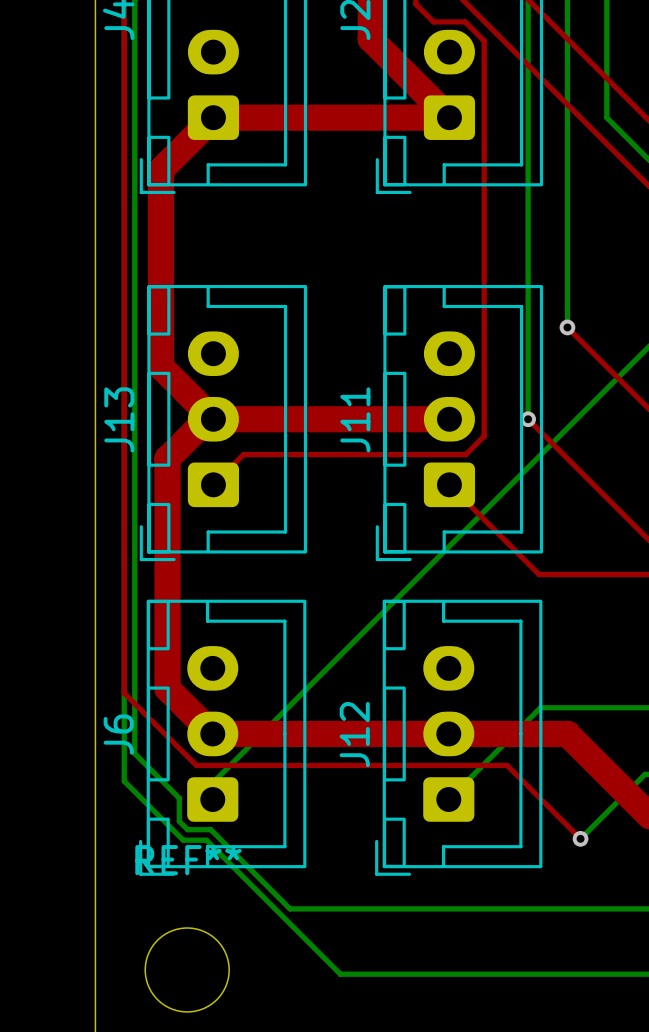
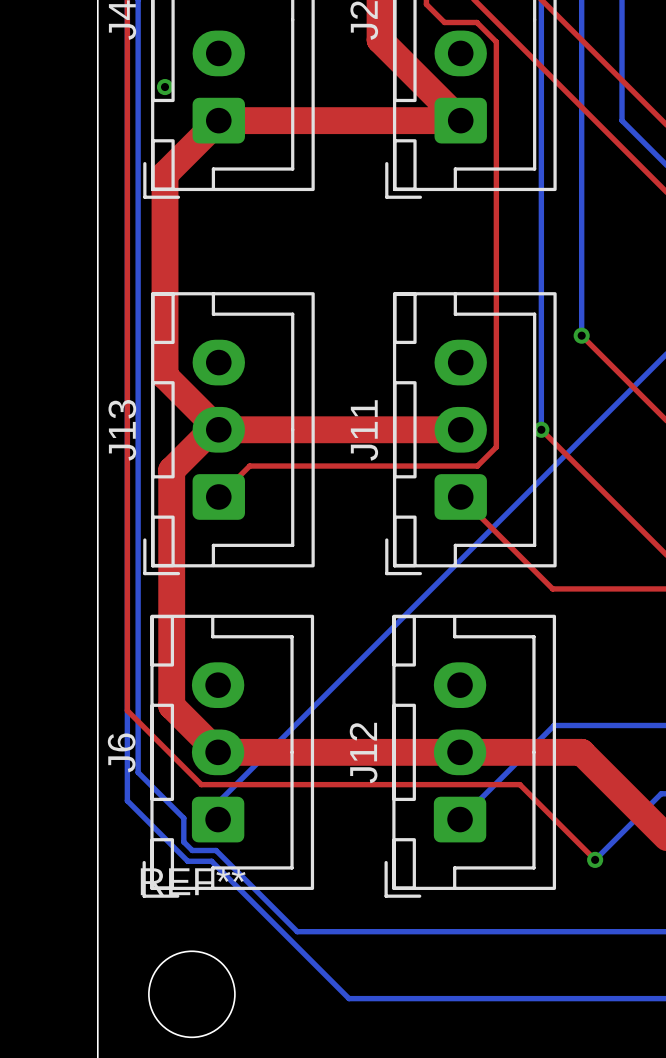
via: none -> (165, 87)

